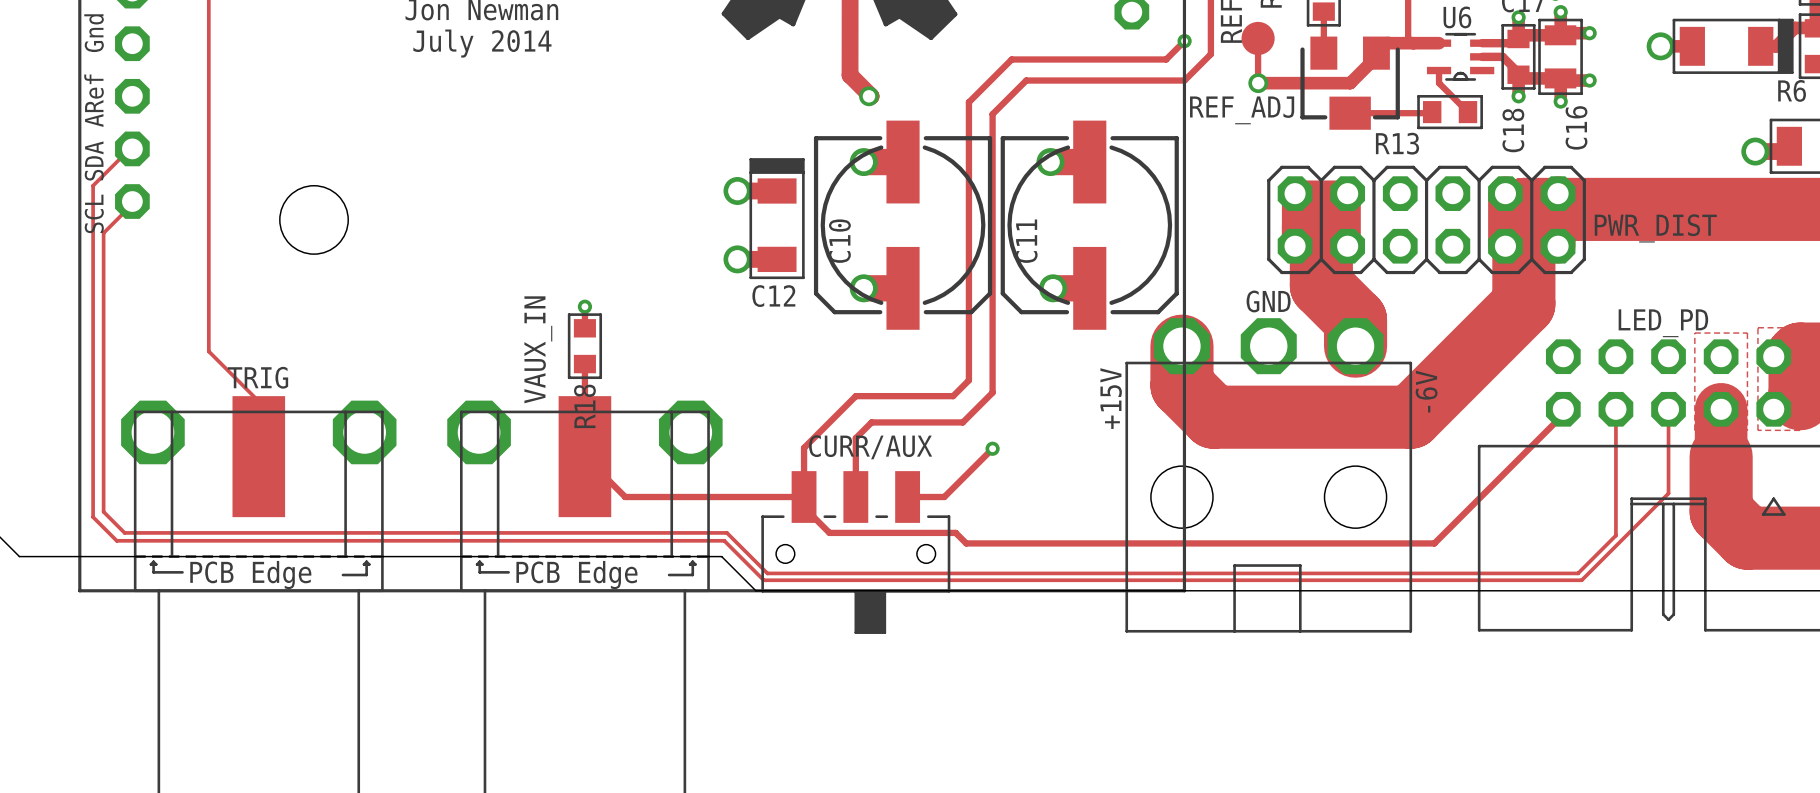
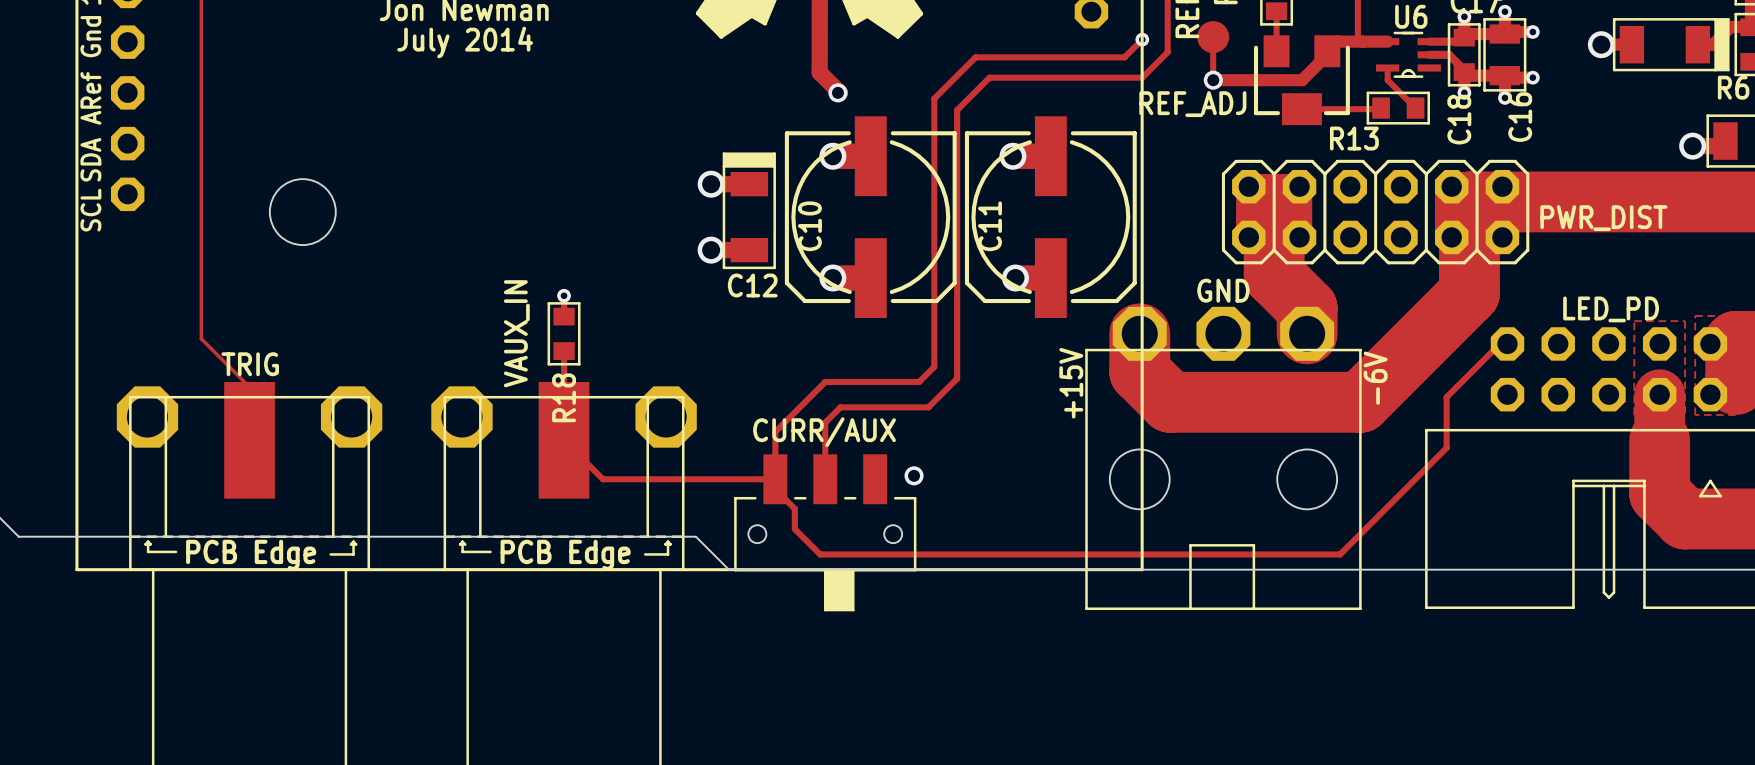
track: (132, 148) (129, 148) (93, 185) (93, 517) (116, 540) (724, 540) (763, 580) (1581, 580) (1668, 493) (1668, 409) -> none
track: (132, 201) (132, 204) (103, 233) (103, 511) (124, 532) (726, 532) (767, 573) (1578, 573) (1615, 535) (1615, 409) -> none
track: (1563, 409) (1563, 414) (1434, 543) (966, 543) (955, 532) (829, 532) (824, 527) -> (1507, 343) (1499, 343) (1446, 397) (1446, 447) (1340, 554) (820, 554) (794, 529) (794, 508)
track: (992, 448) (944, 497) (907, 497) -> none
via: (992, 448) -> none
via: none -> (914, 475)

